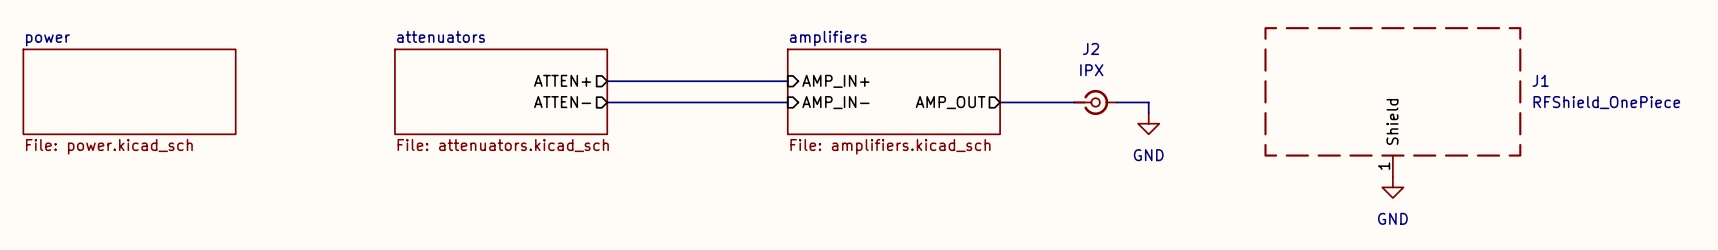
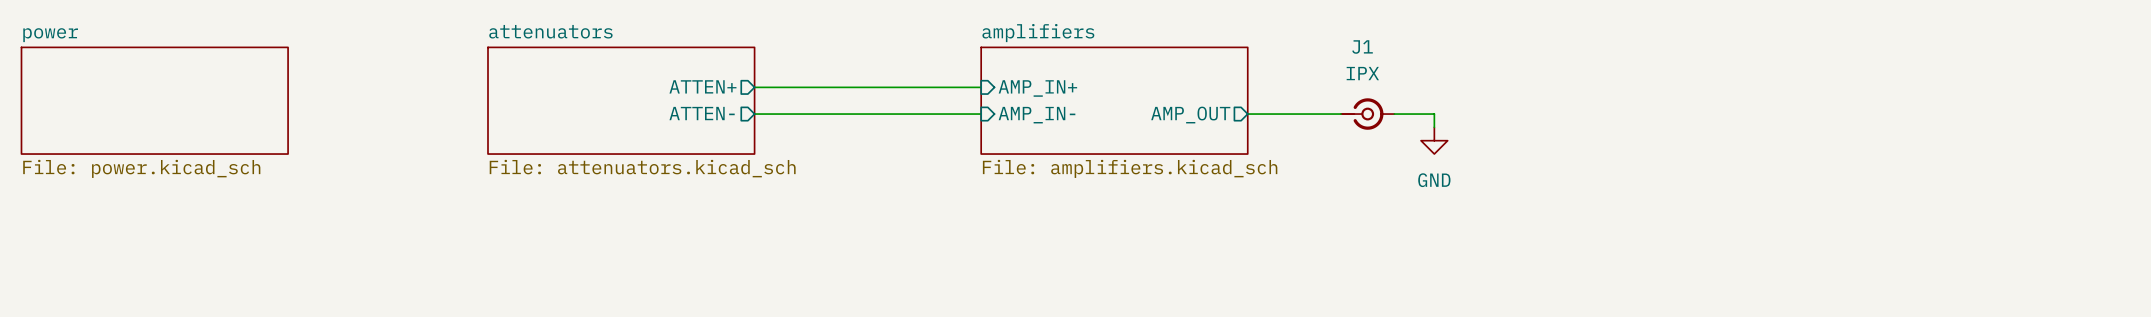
J2 name: J2 (1091, 48) -> J1 (1362, 47)
J1: RFShield_OnePiece (1392, 101) -> none
power symbol: GND (1392, 187) -> none

